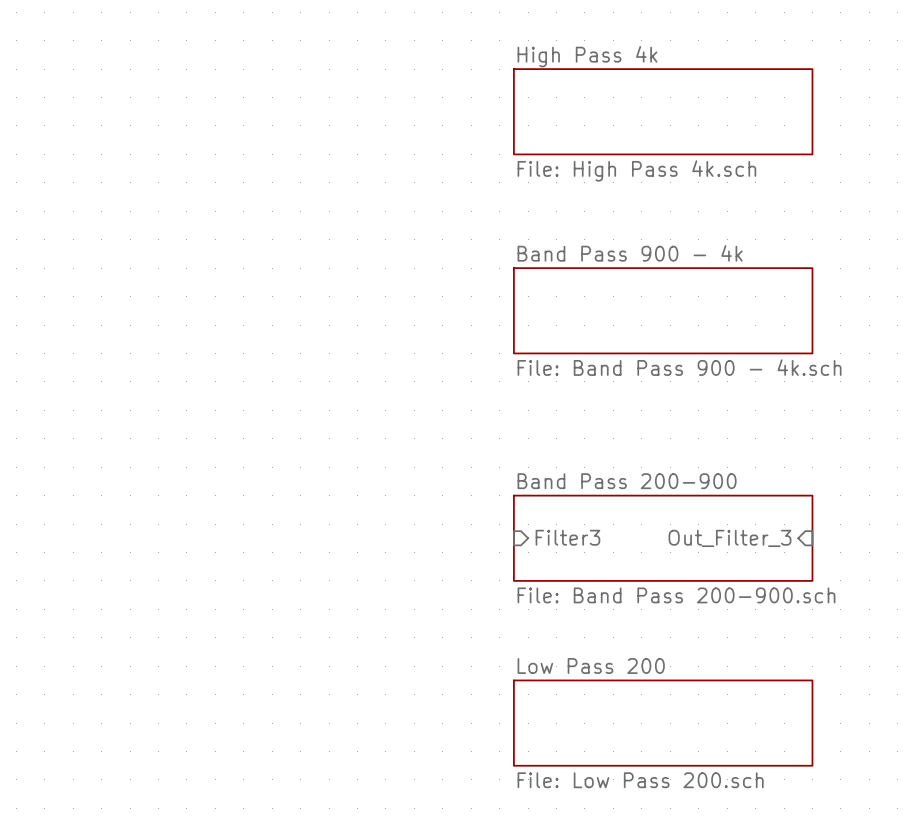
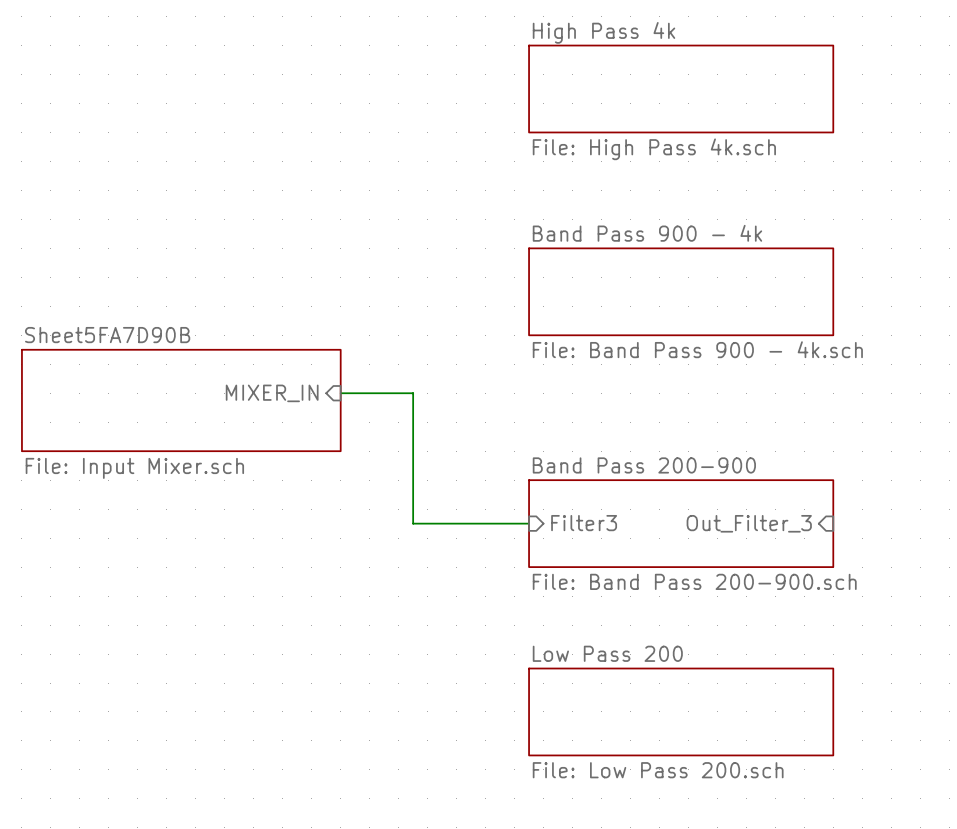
sheet pin: none -> MIXER_IN (272, 393)
wire: none -> (340, 393) (413, 393) (413, 523) (529, 523)
sheet Sheet5FA7D90B: none -> File: Input Mixer.sch (181, 400)

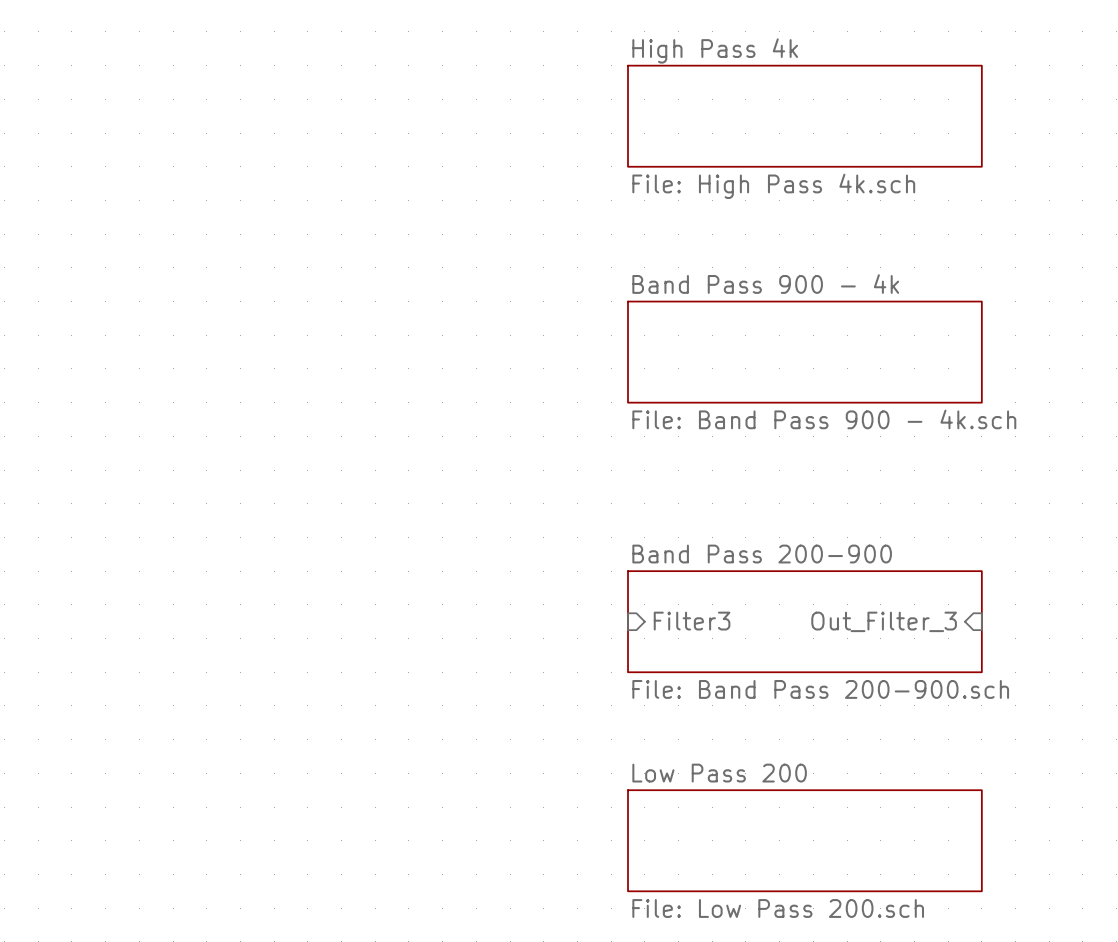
sheet pin: MIXER_IN (272, 393) -> none
wire: (340, 393) (413, 393) (413, 523) (529, 523) -> none
sheet Sheet5FA7D90B: File: Input Mixer.sch (181, 400) -> none

